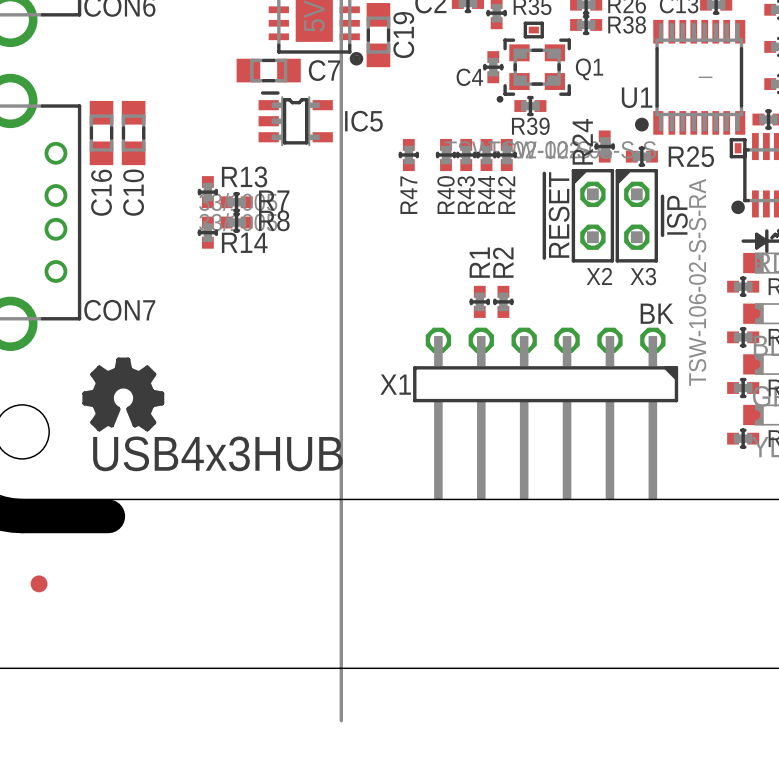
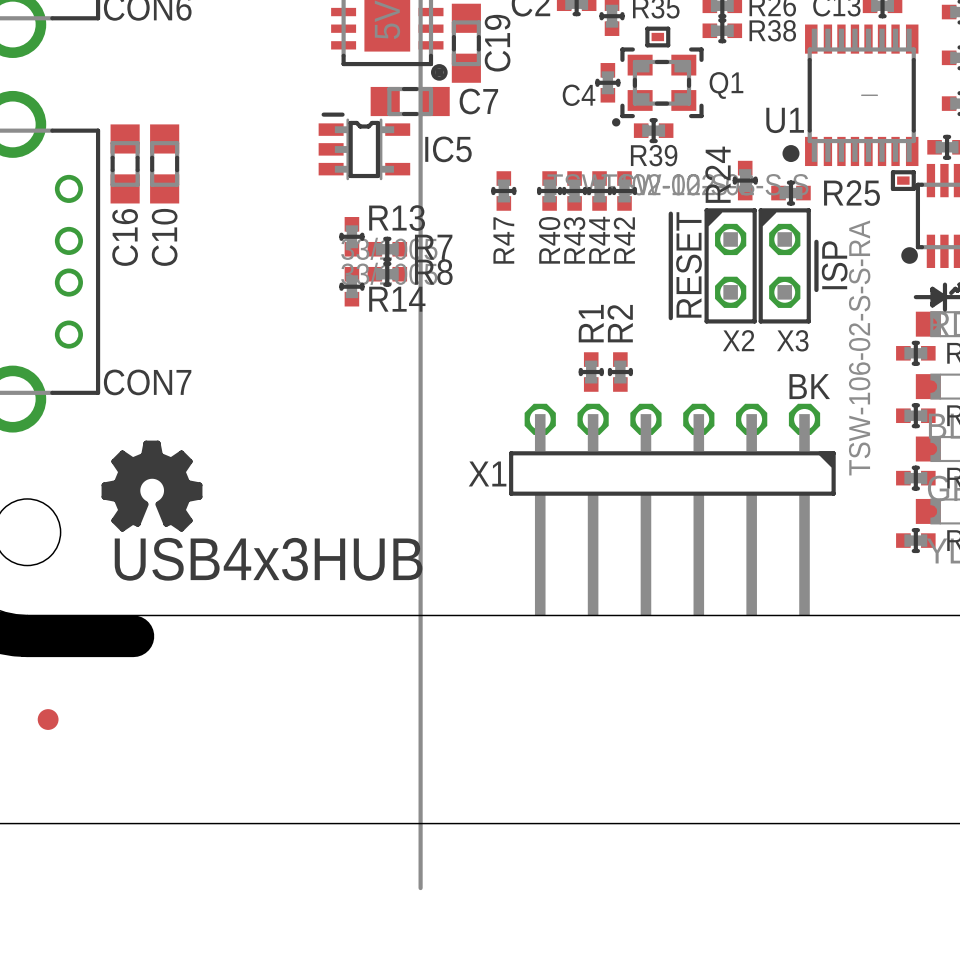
C7 position: (268, 70) -> (410, 101)
part rotation: 0° (738, 148) -> 90° clockwise (903, 180)
R13 position: (207, 192) -> (351, 236)
R7 position: (236, 202) -> (387, 249)
R8 position: (236, 222) -> (387, 274)
R14 position: (207, 232) -> (351, 286)

